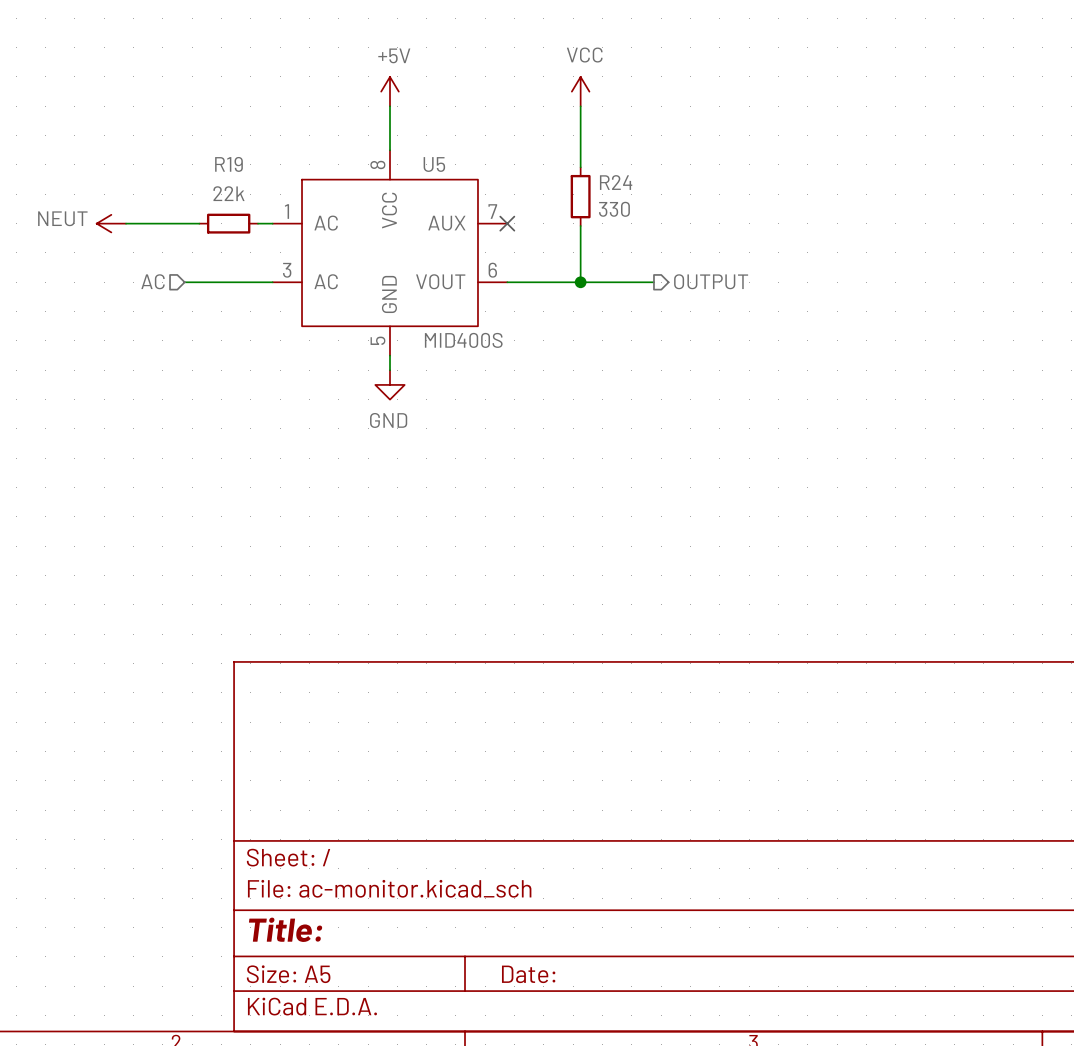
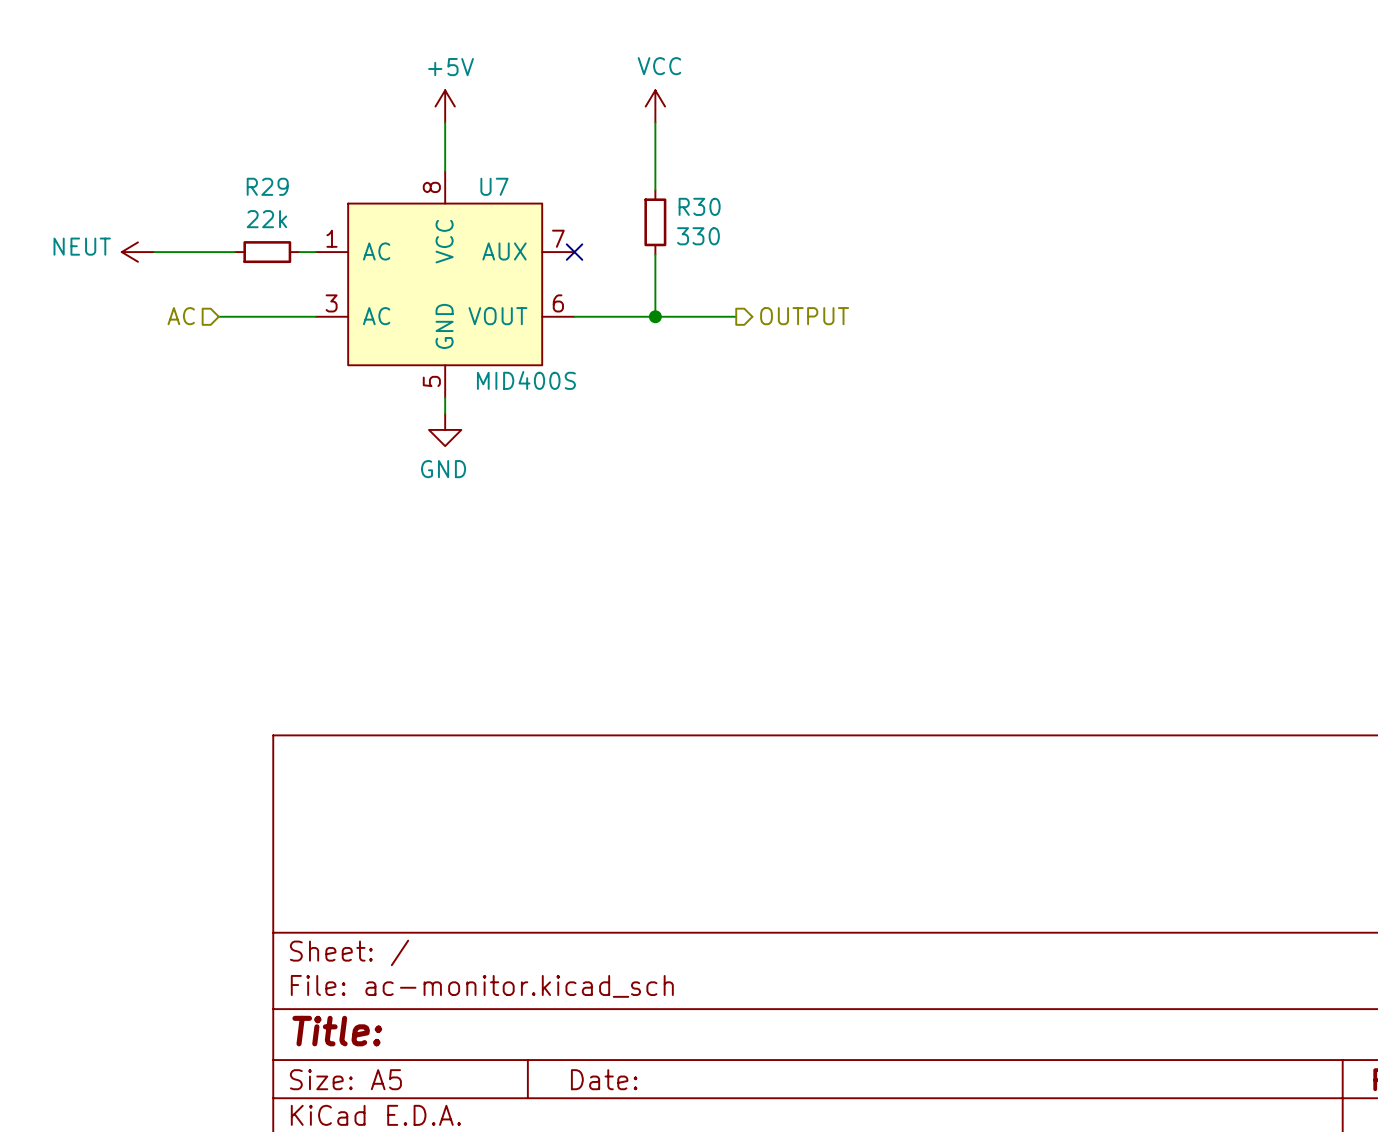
R19 name: R19 (228, 164) -> R29 (267, 186)
U5 name: U5 (434, 164) -> U7 (494, 186)
R24 name: R24 (616, 182) -> R30 (699, 206)

